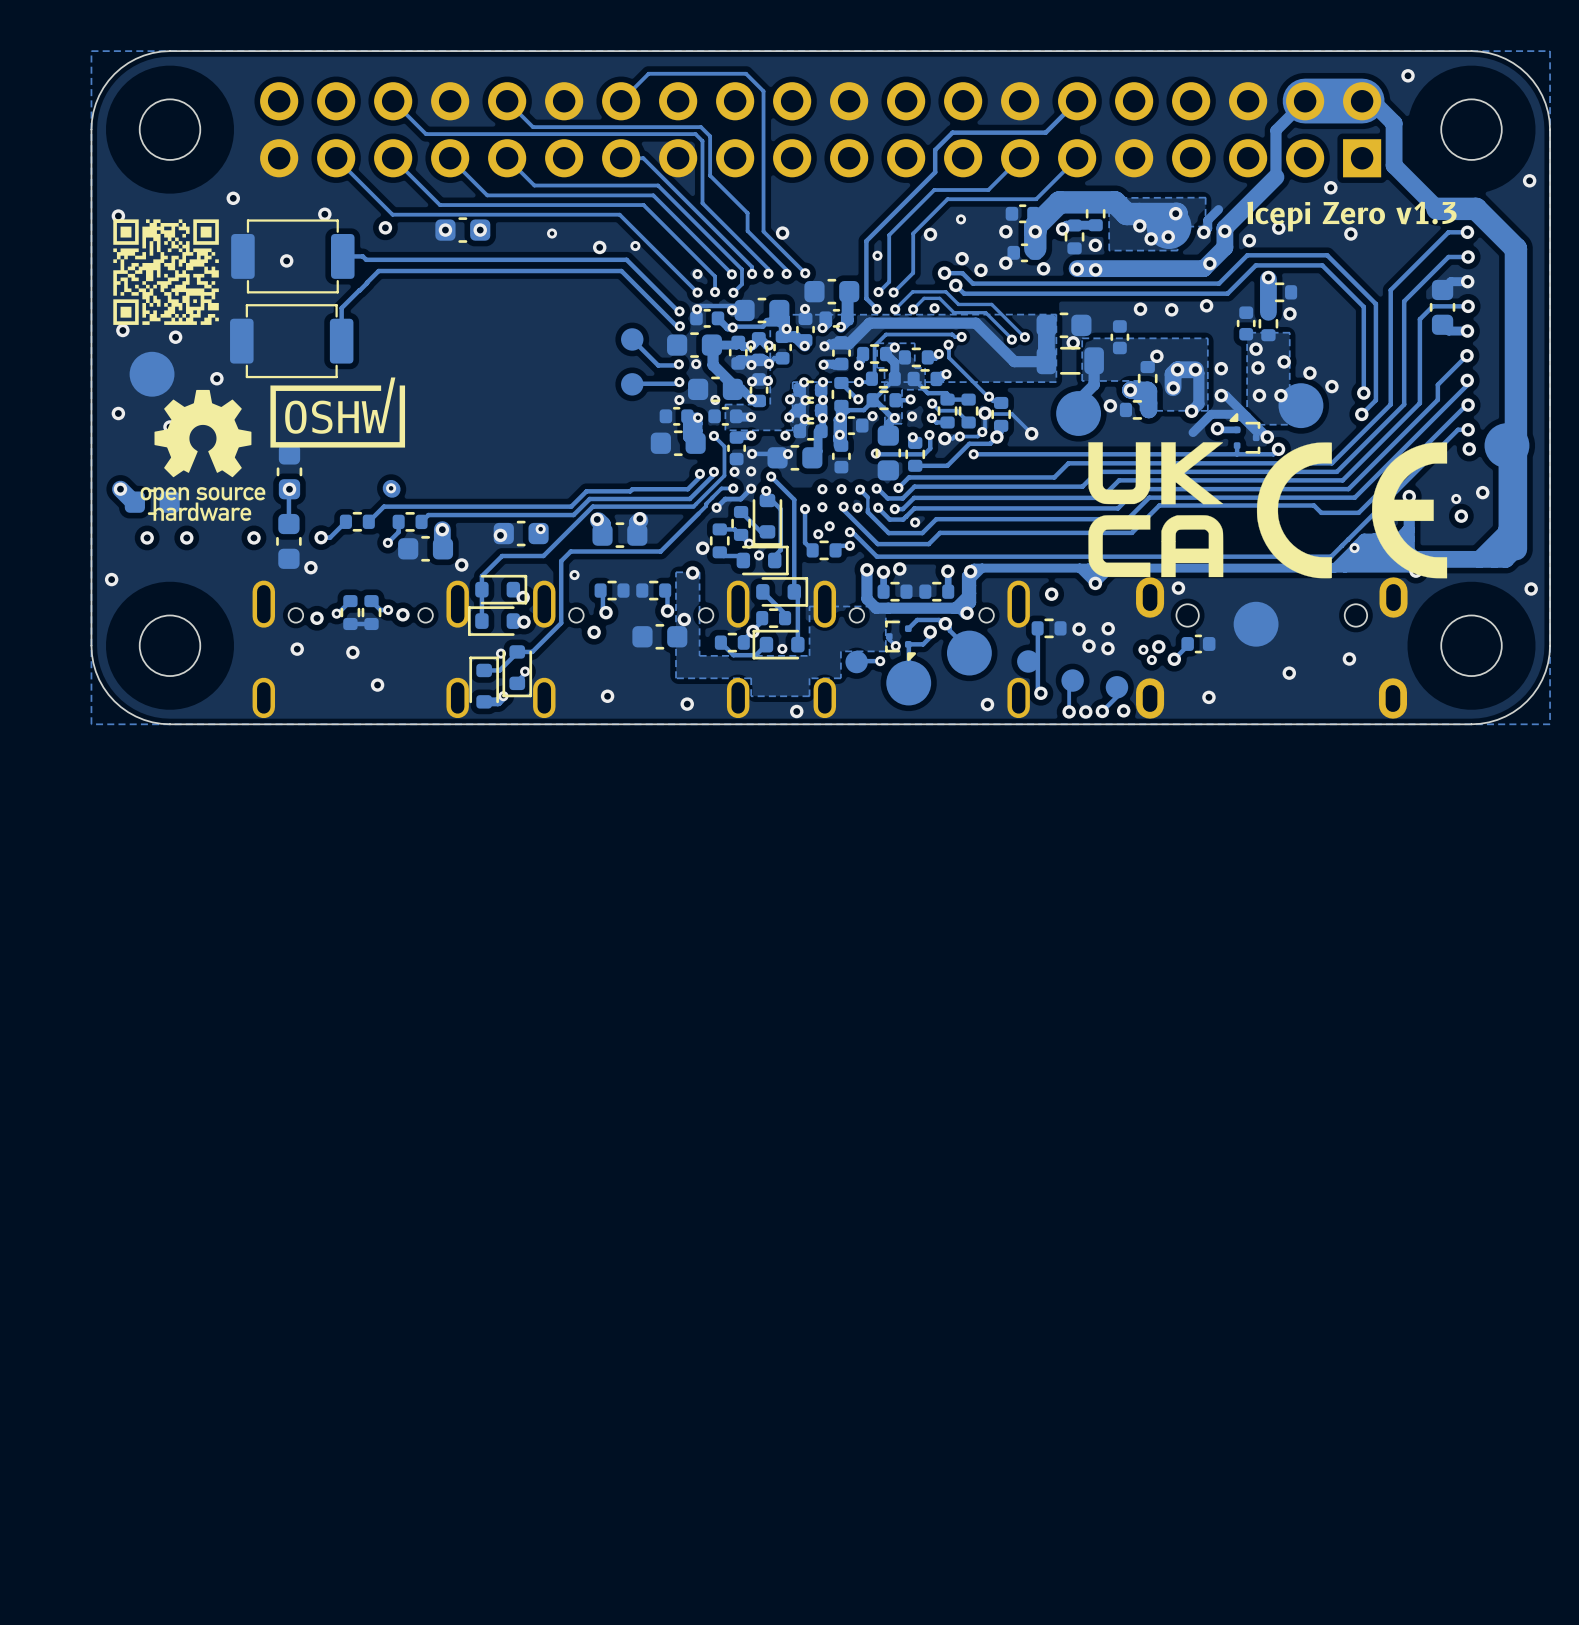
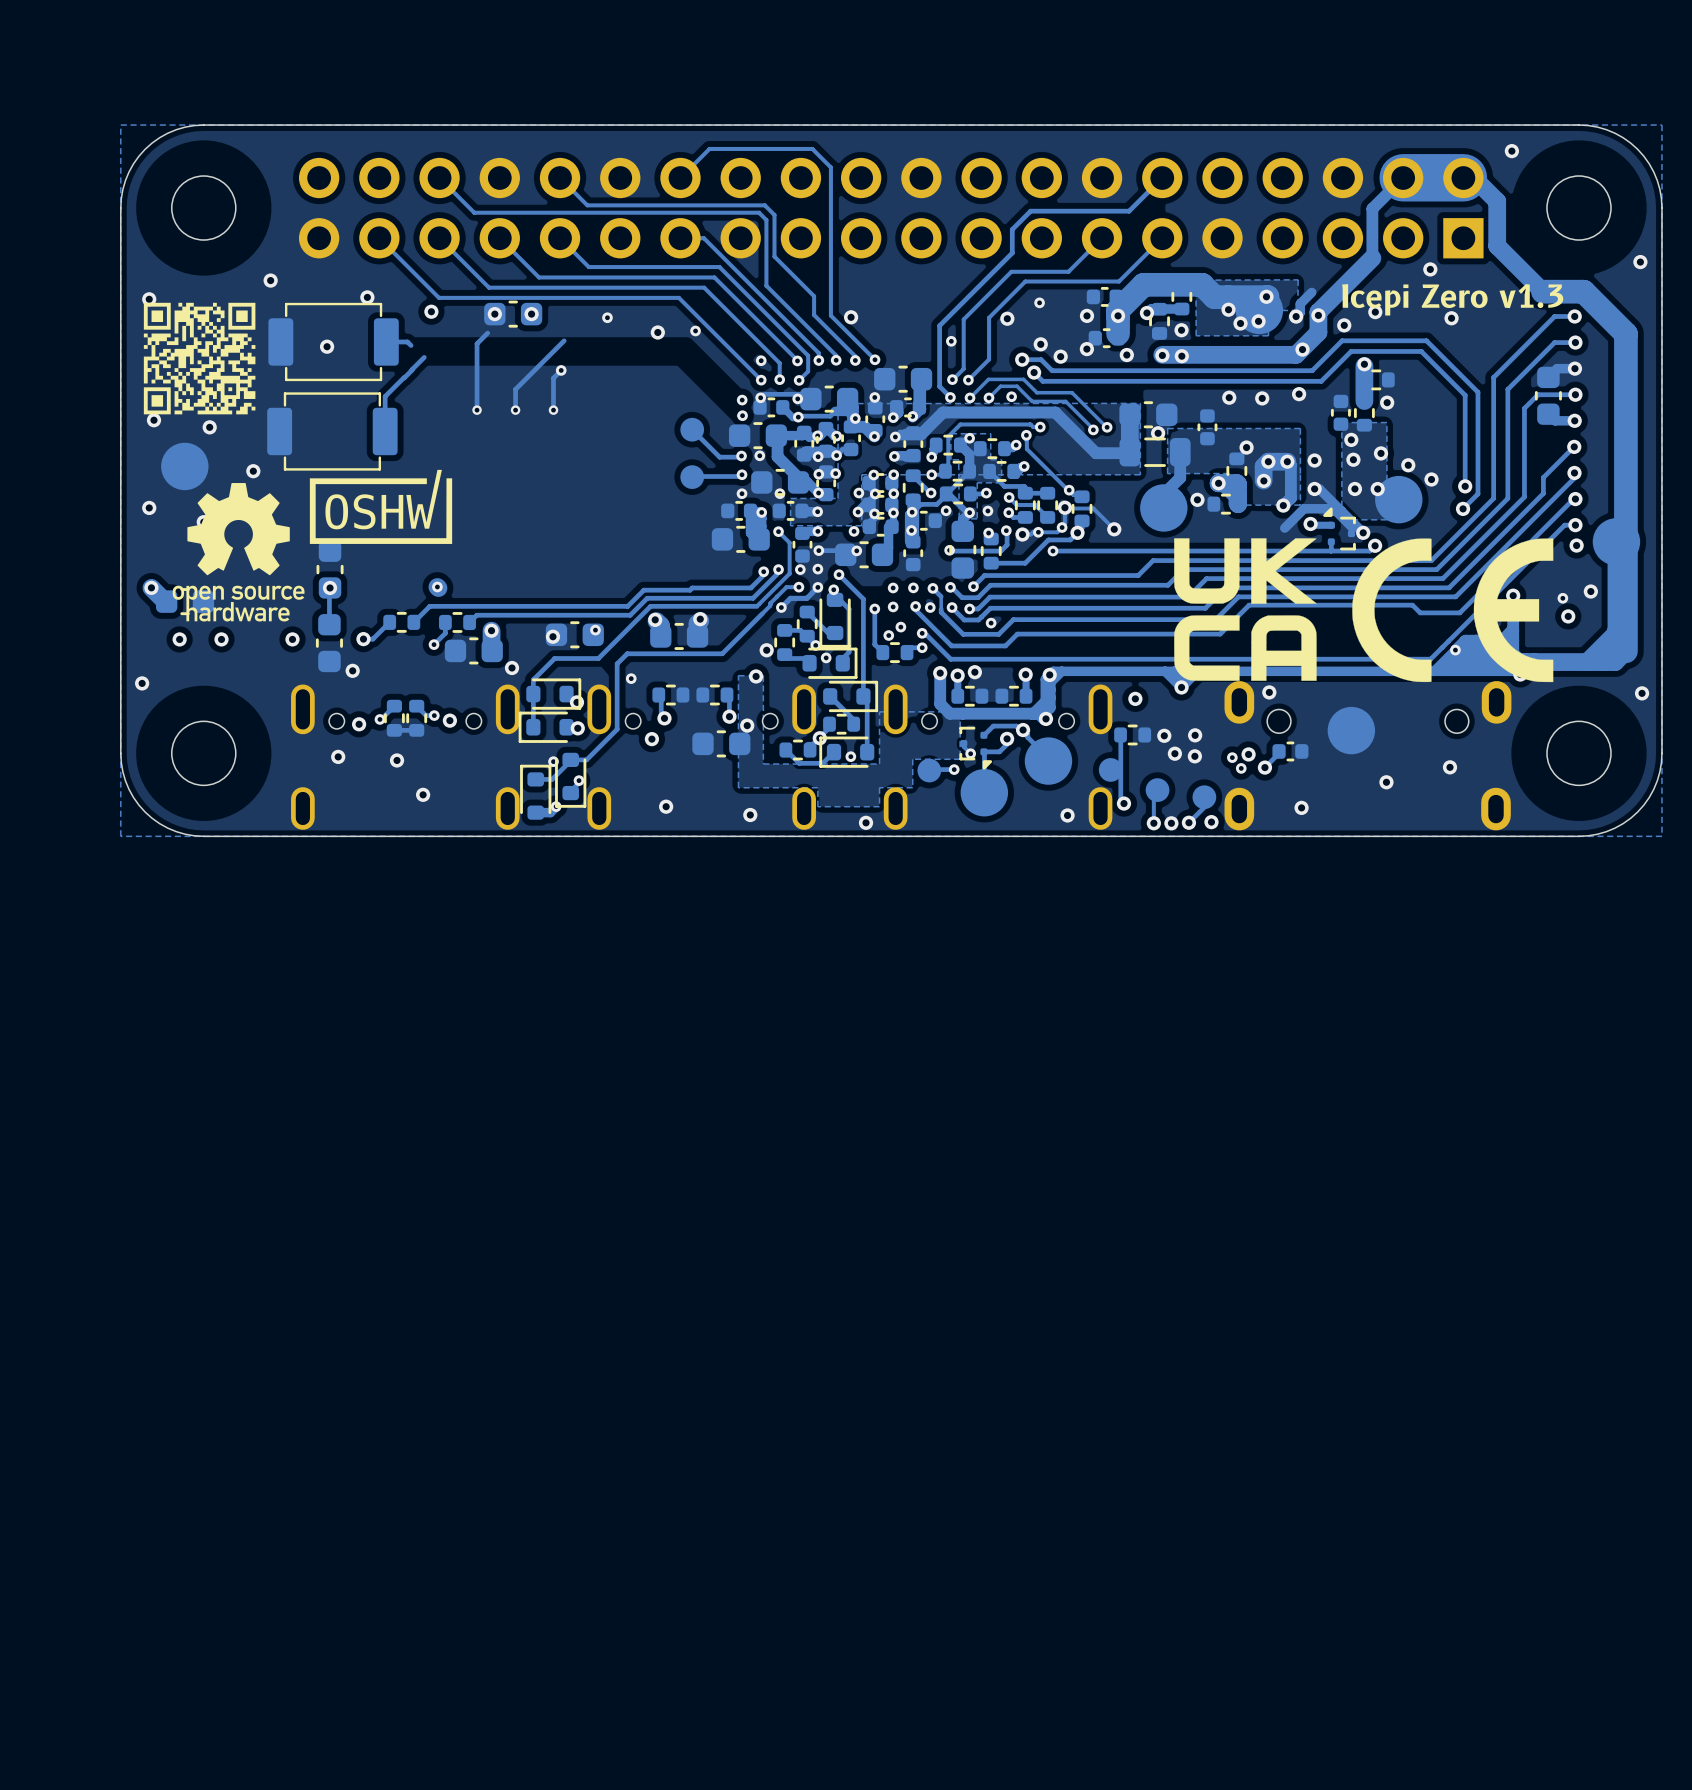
track: none -> (487, 333) (477, 343) (477, 410)
track: none -> (564, 340) (515, 389) (515, 410)
track: (366, 259) (626, 259) (678, 311) -> none
track: (378, 271) (621, 271) (676, 326) -> none
track: none -> (561, 370) (553, 378) (553, 410)
via: none -> (561, 370)
via: none -> (477, 410)
via: none -> (515, 410)
via: none -> (553, 410)

